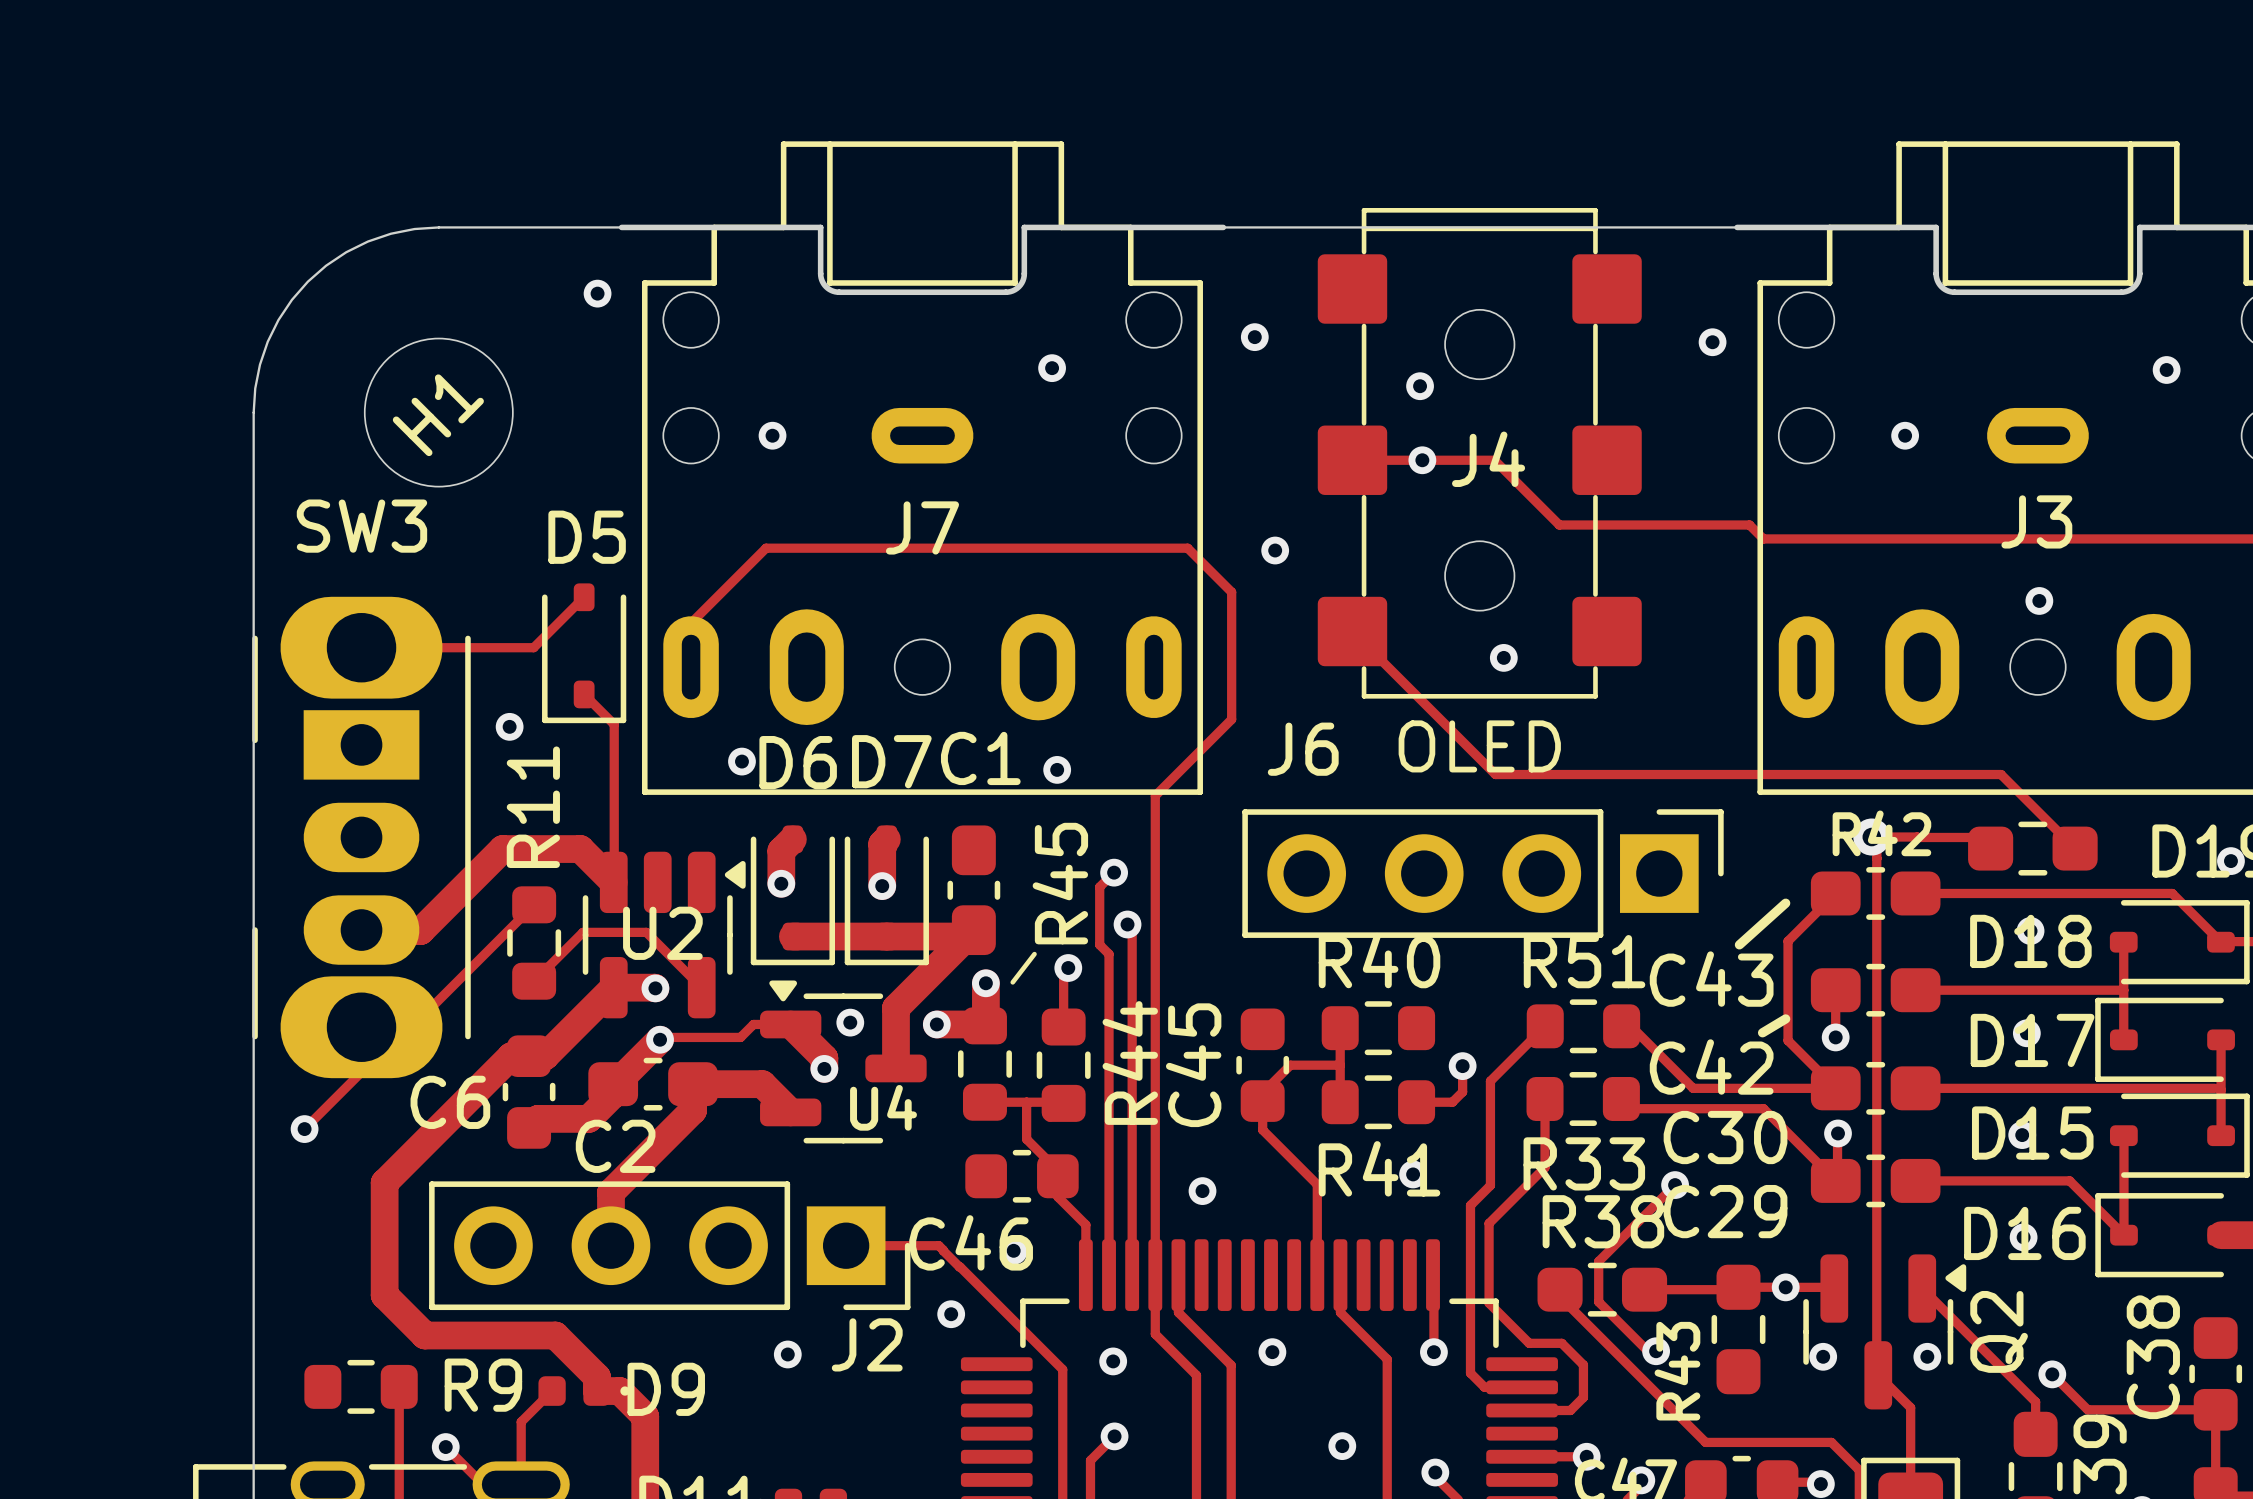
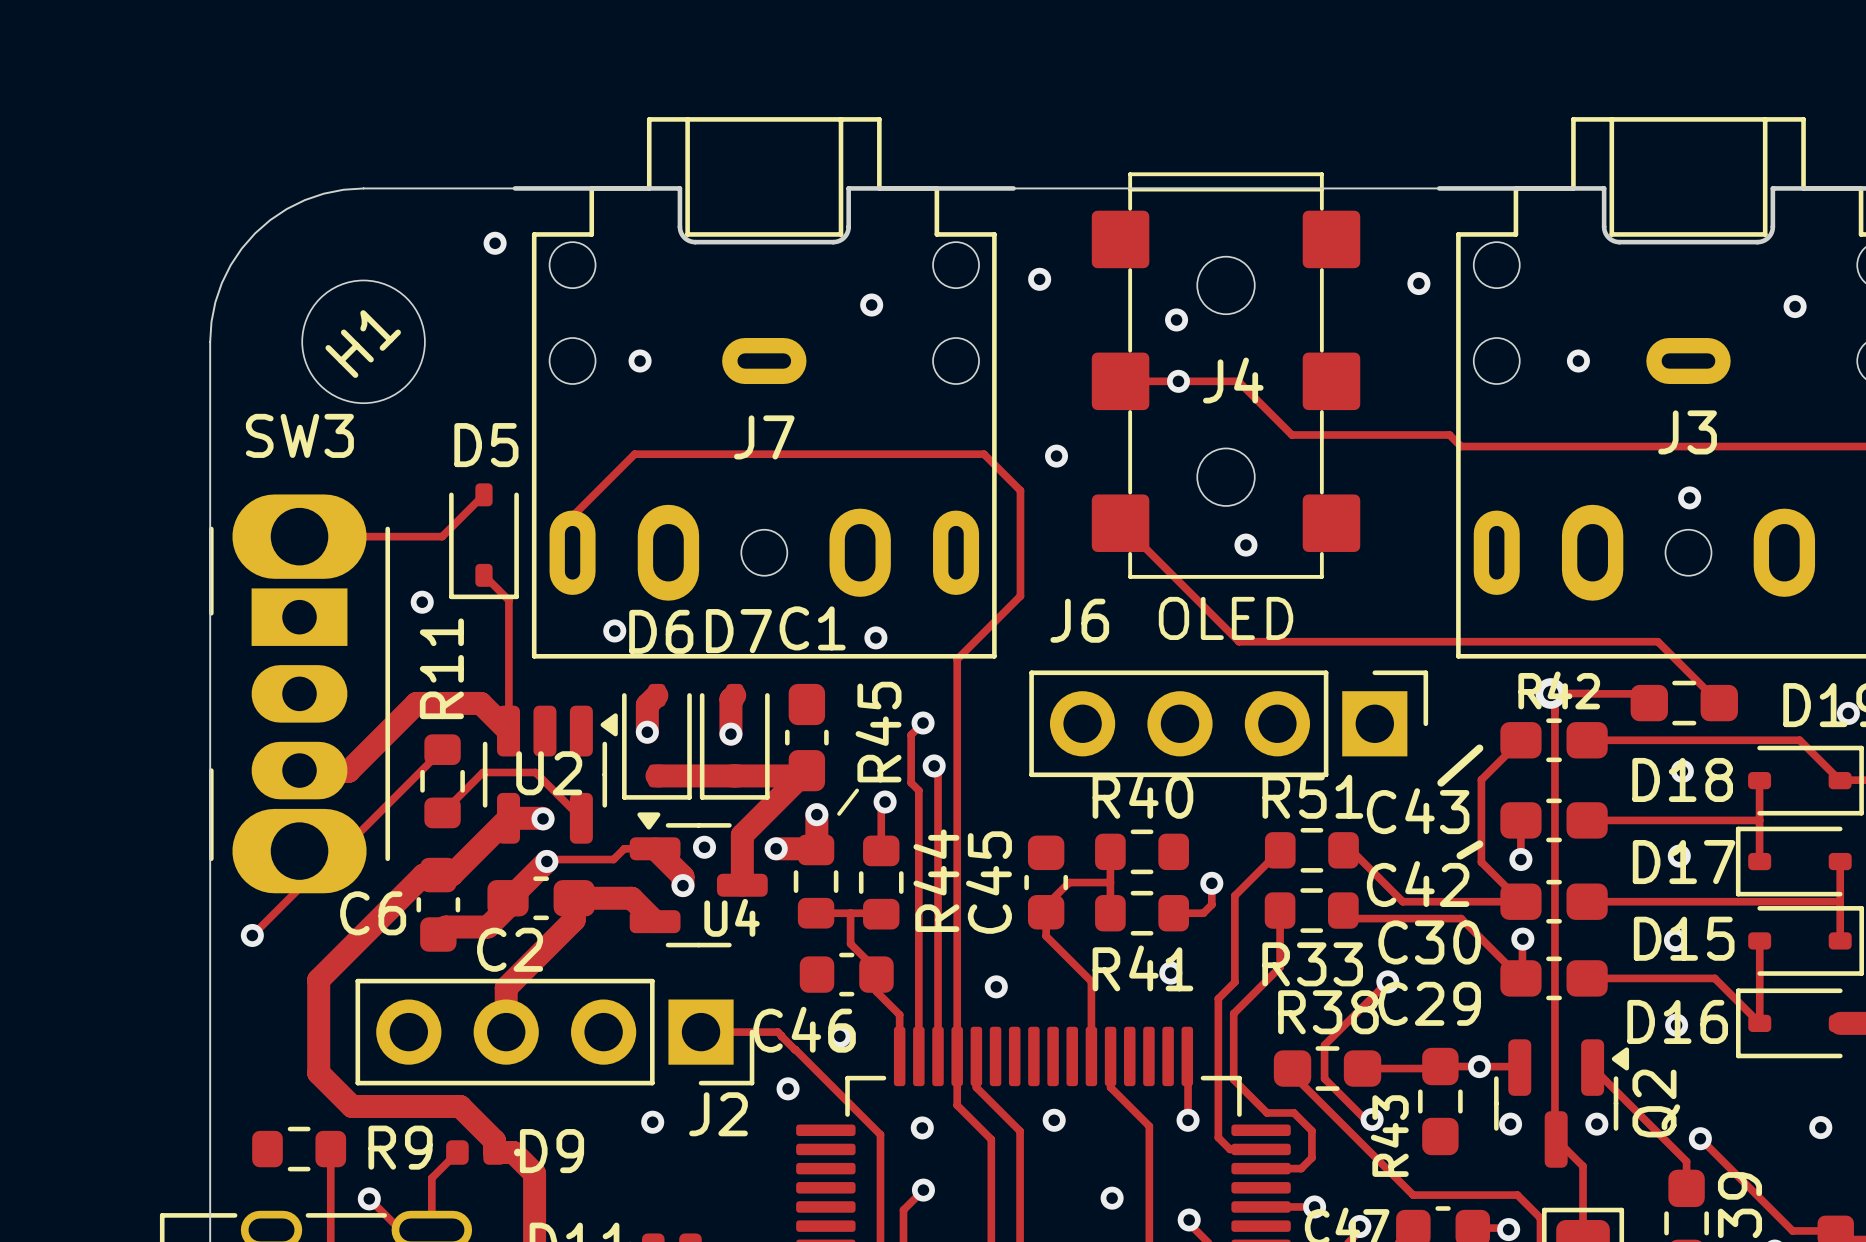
via: none -> (1820, 1127)
C38: (2215, 1373) -> none
track: (2087, 1409) (2218, 1409) -> (1729, 1168) (1792, 1230) (1835, 1230)
track: (2215, 1409) (2215, 1485) -> none

